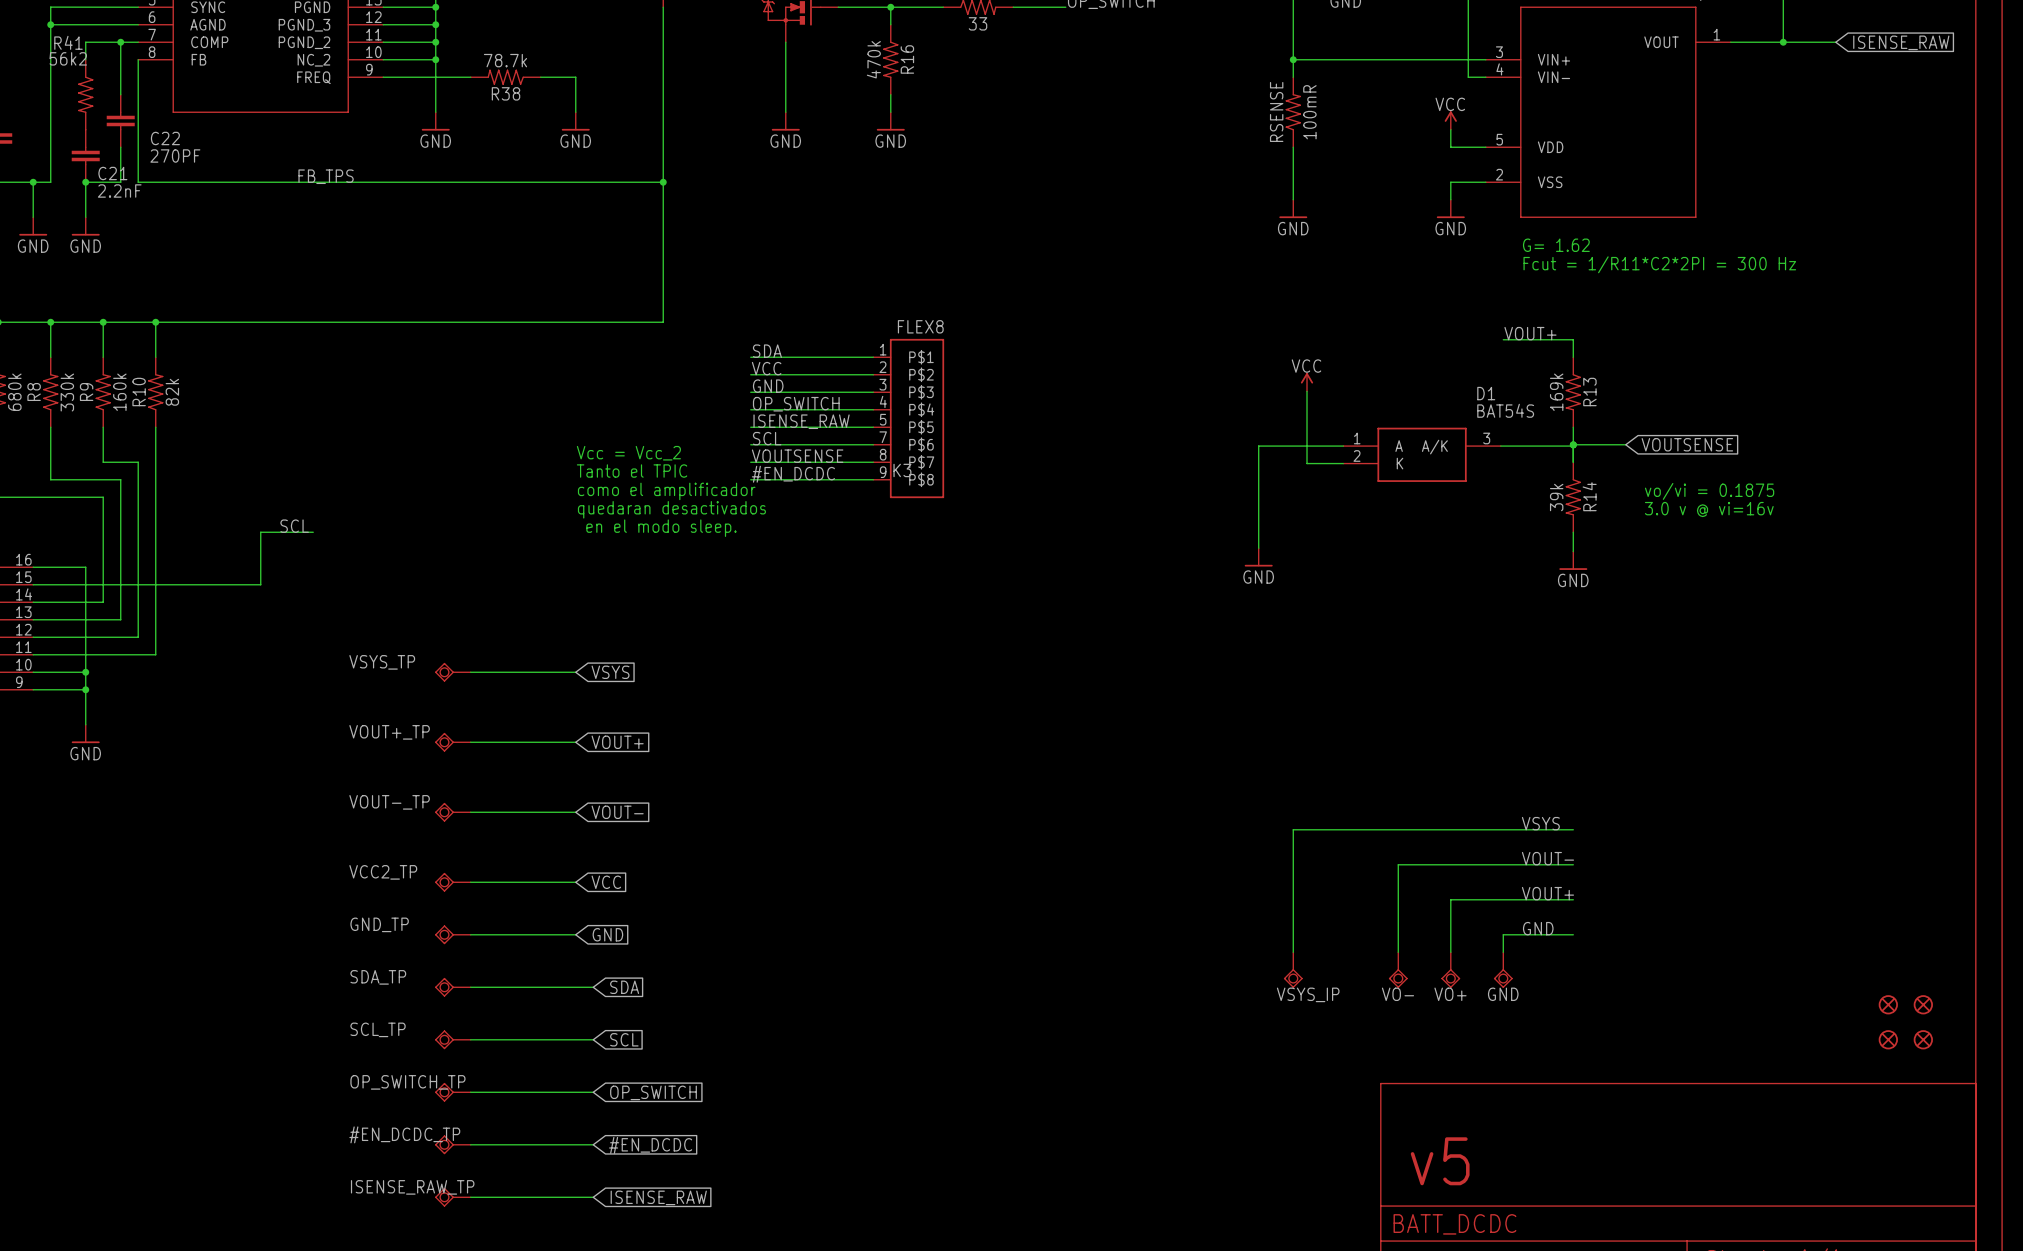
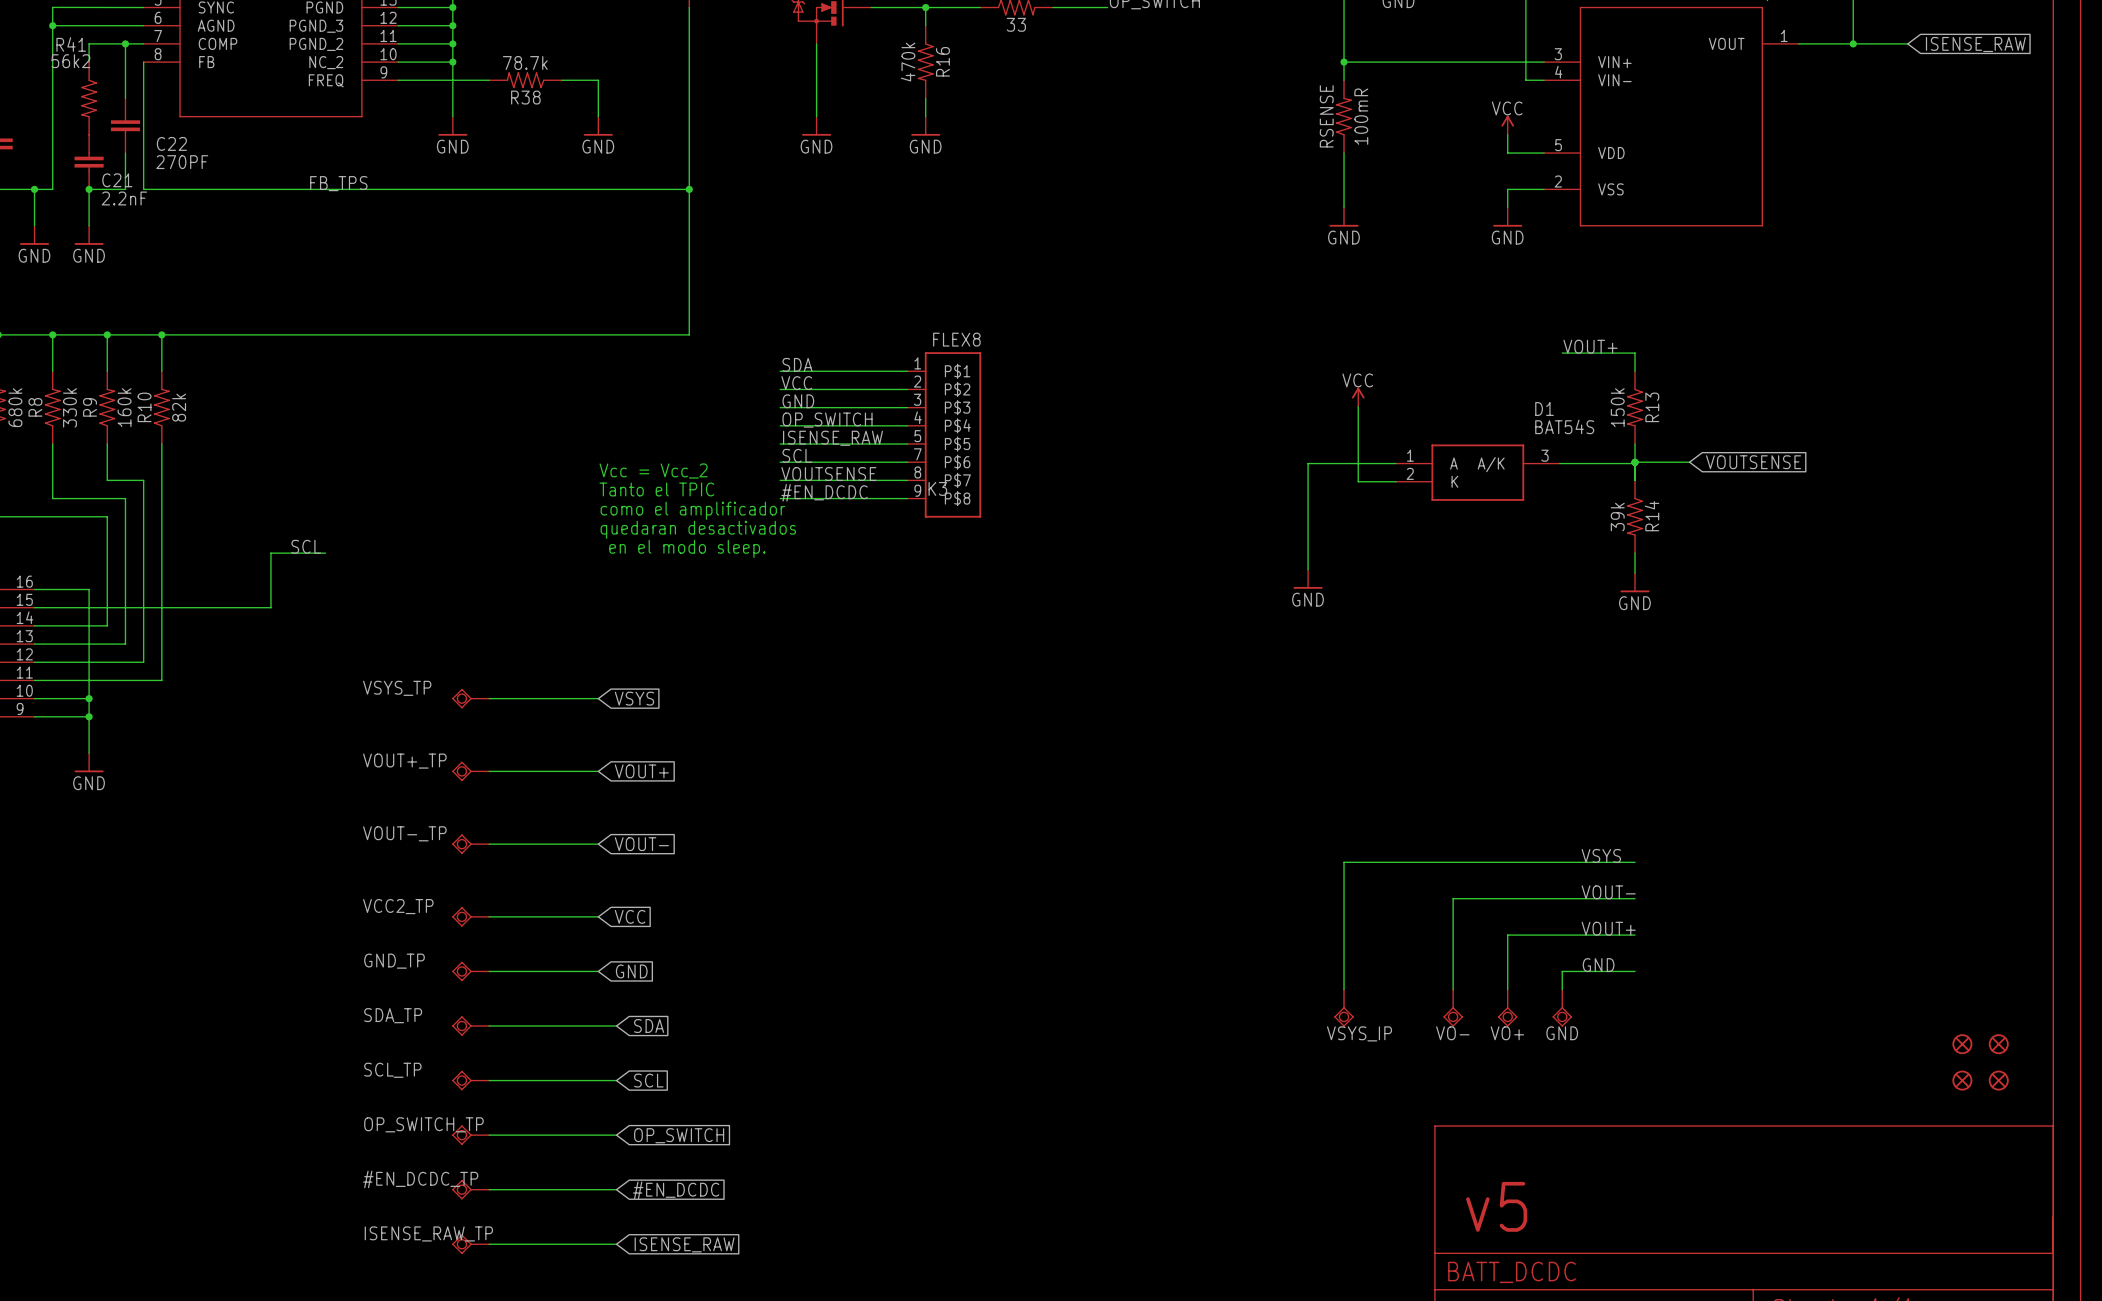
text: G= 1.62 (1556, 245) -> none
text: Fcut = 1/R11*C2*2PI = 300 Hz (1659, 264) -> none
R13 value: 169k (1556, 392) -> 150k (1617, 407)
text: vo/vi = 0.1875 (1709, 491) -> none
text: 3.0 v @ vi=16v (1709, 509) -> none

